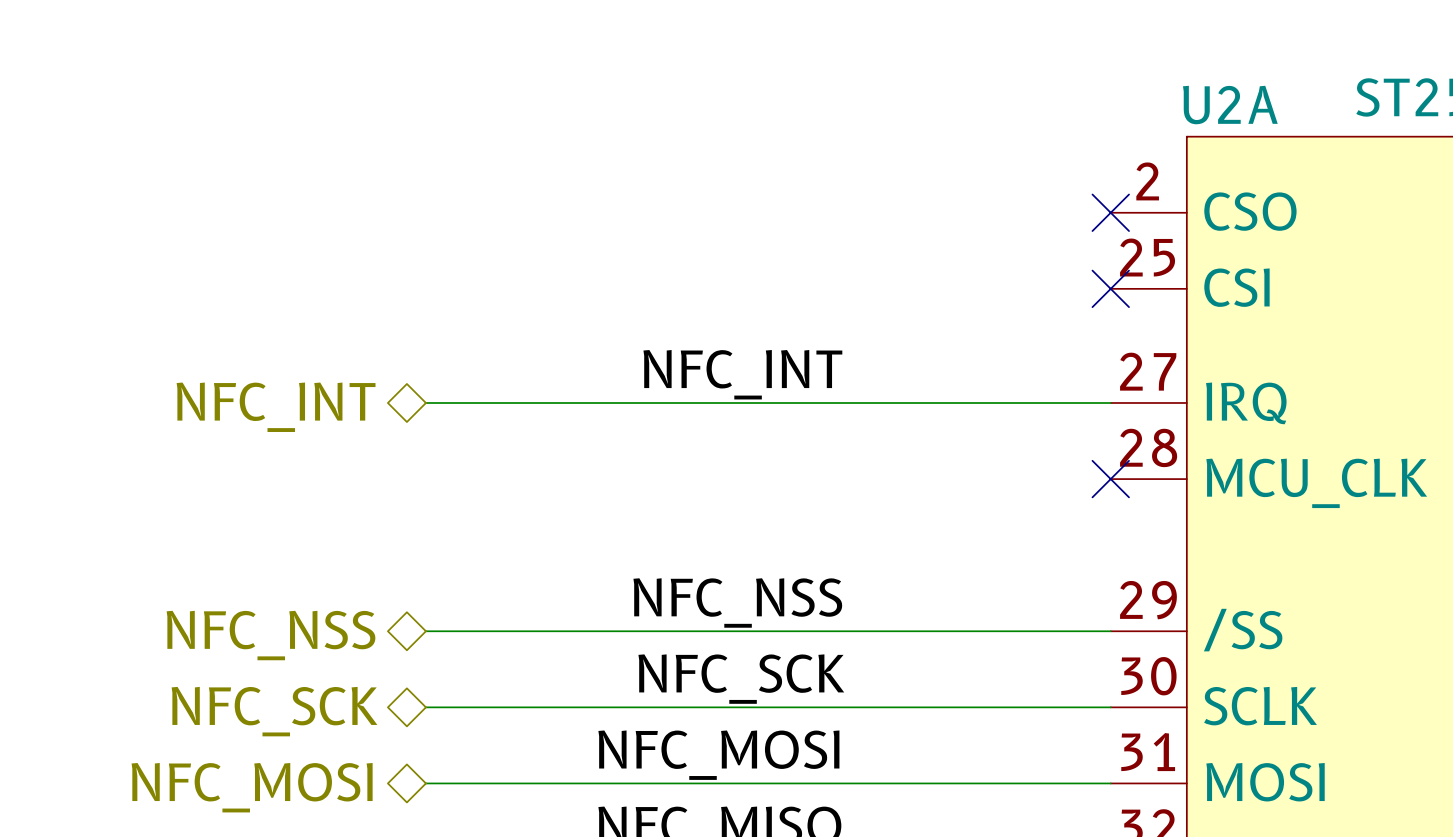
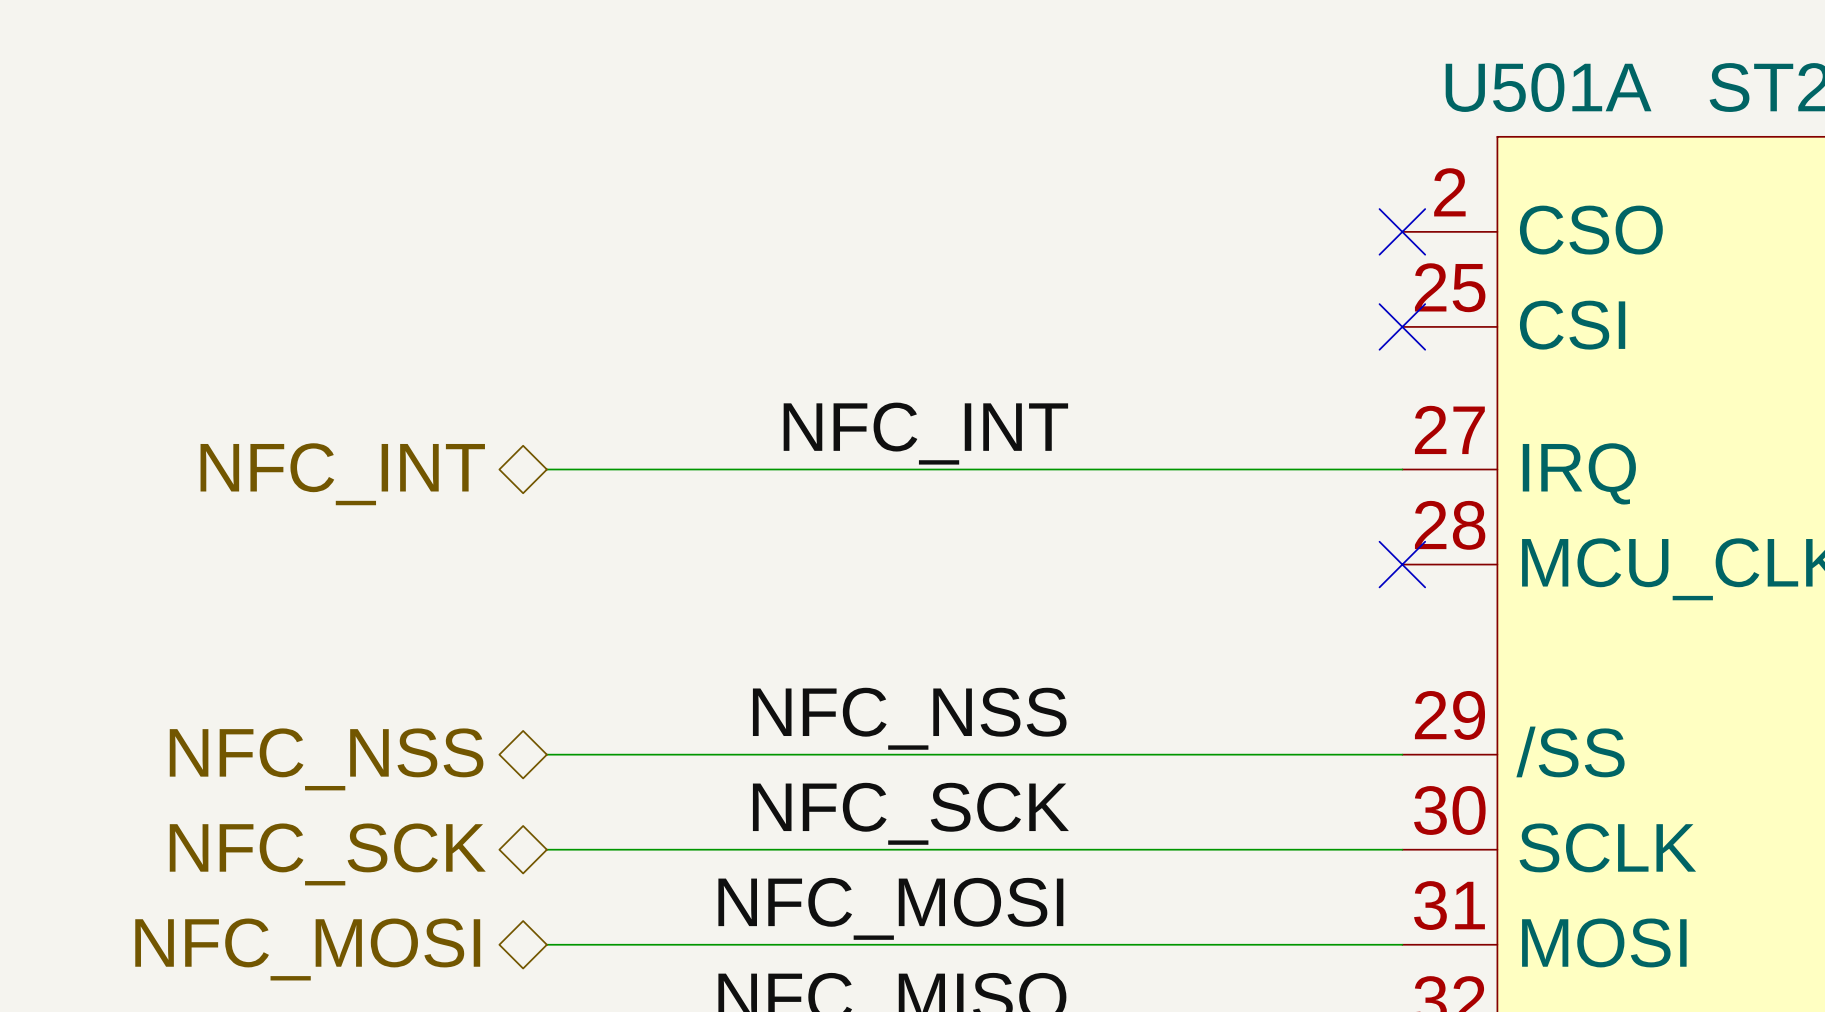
U2A name: U2A (1230, 105) -> U501A (1548, 87)

